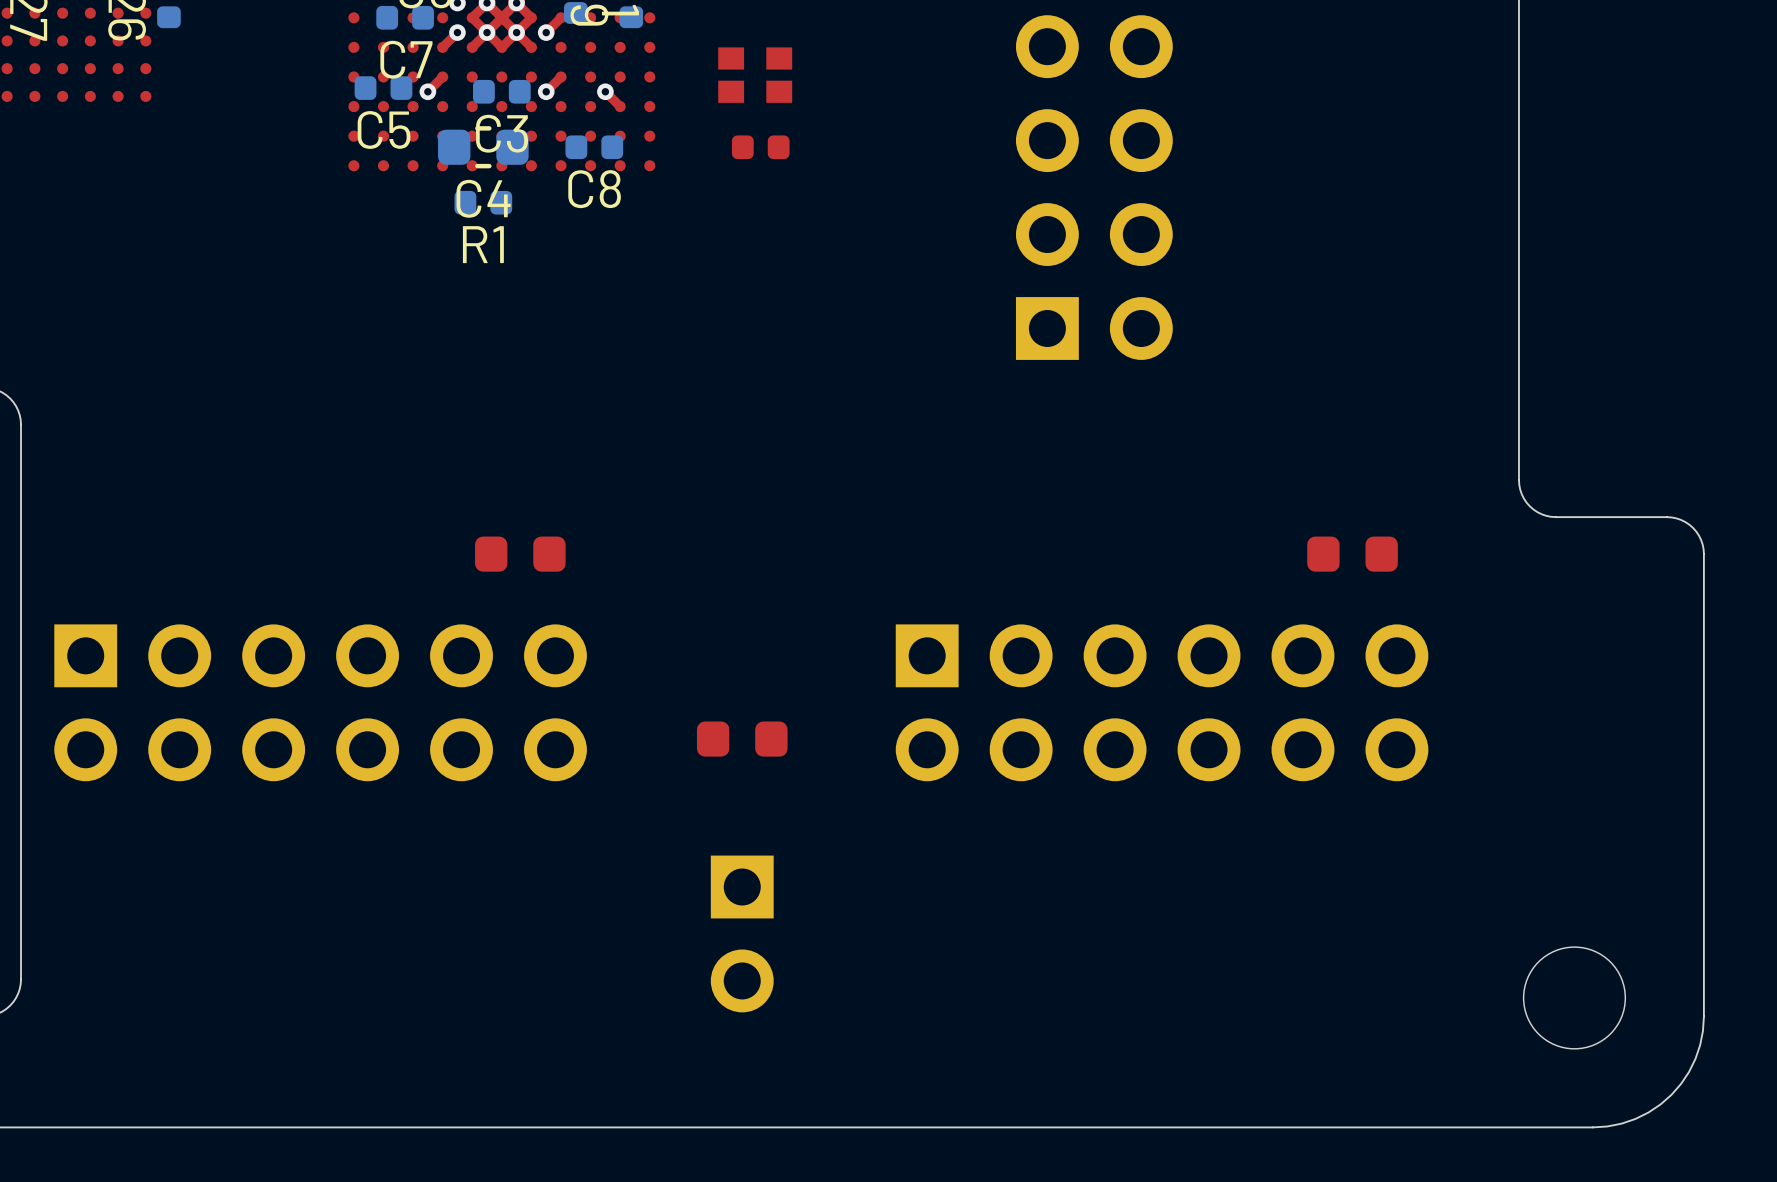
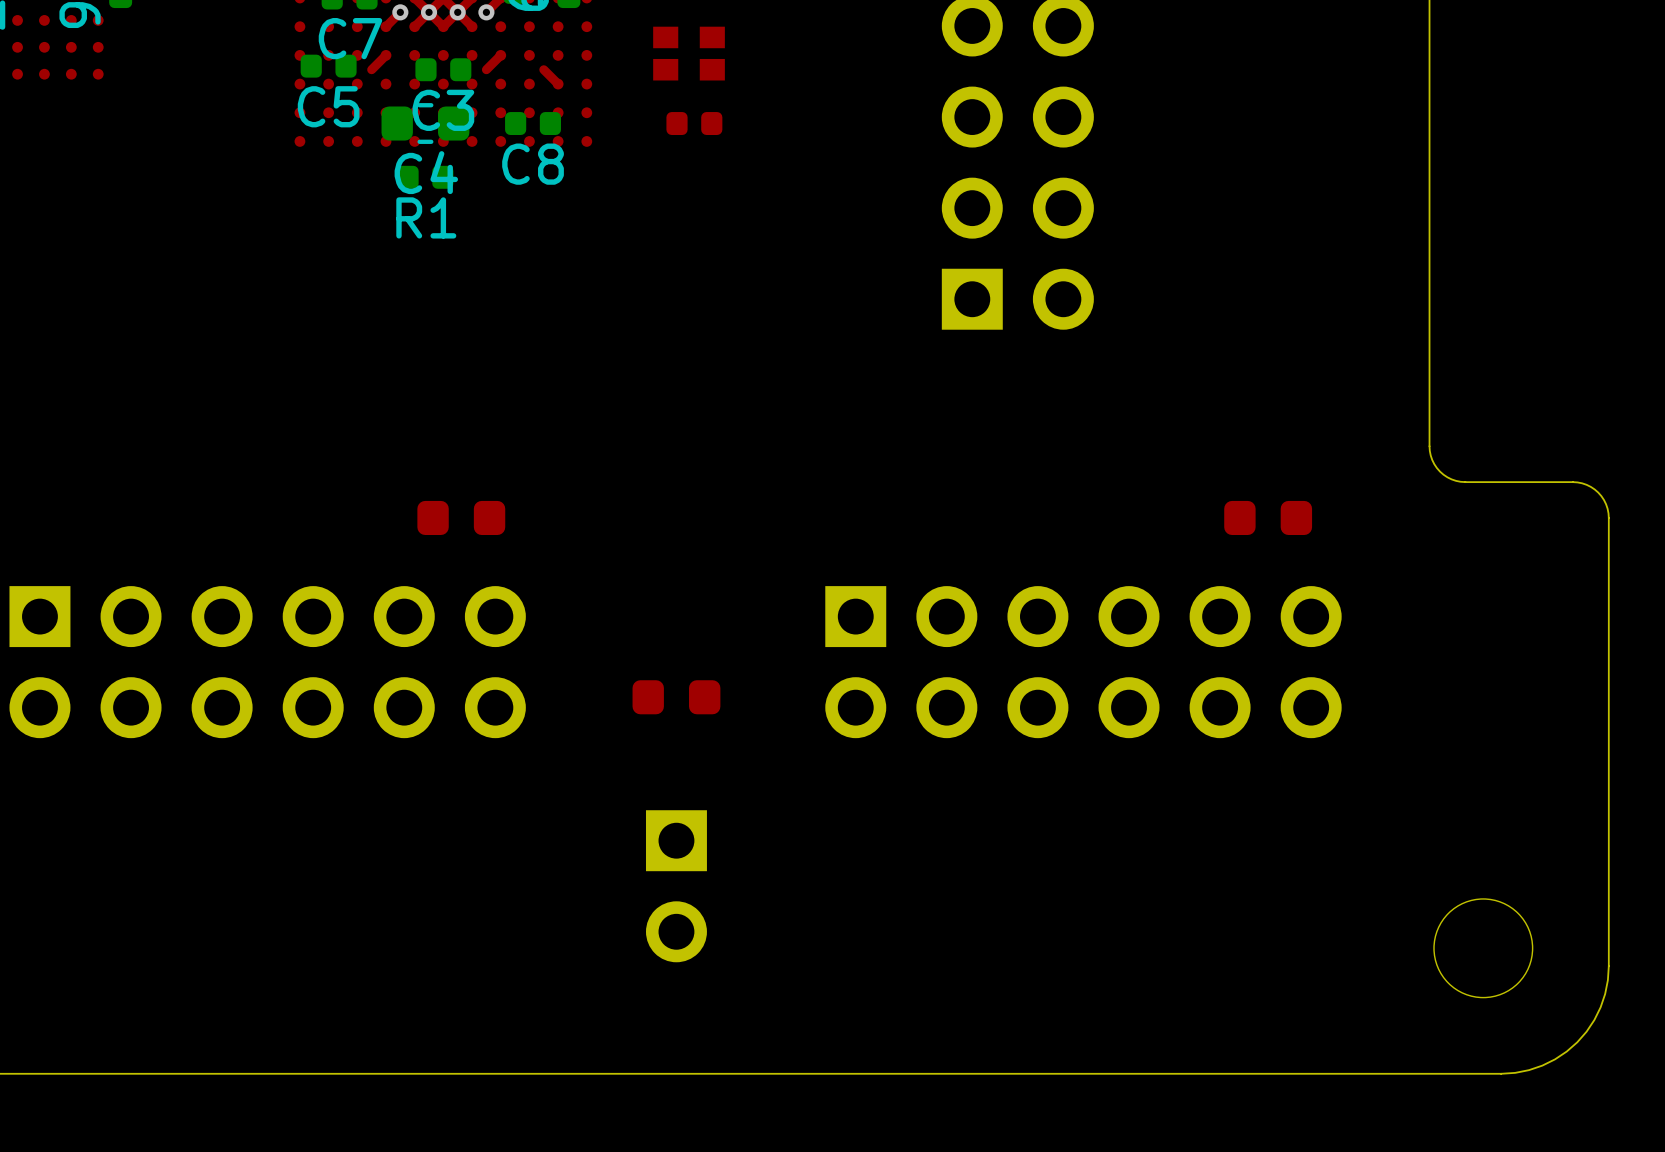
via: (427, 91) -> none
via: (546, 91) -> none
via: (605, 91) -> none

